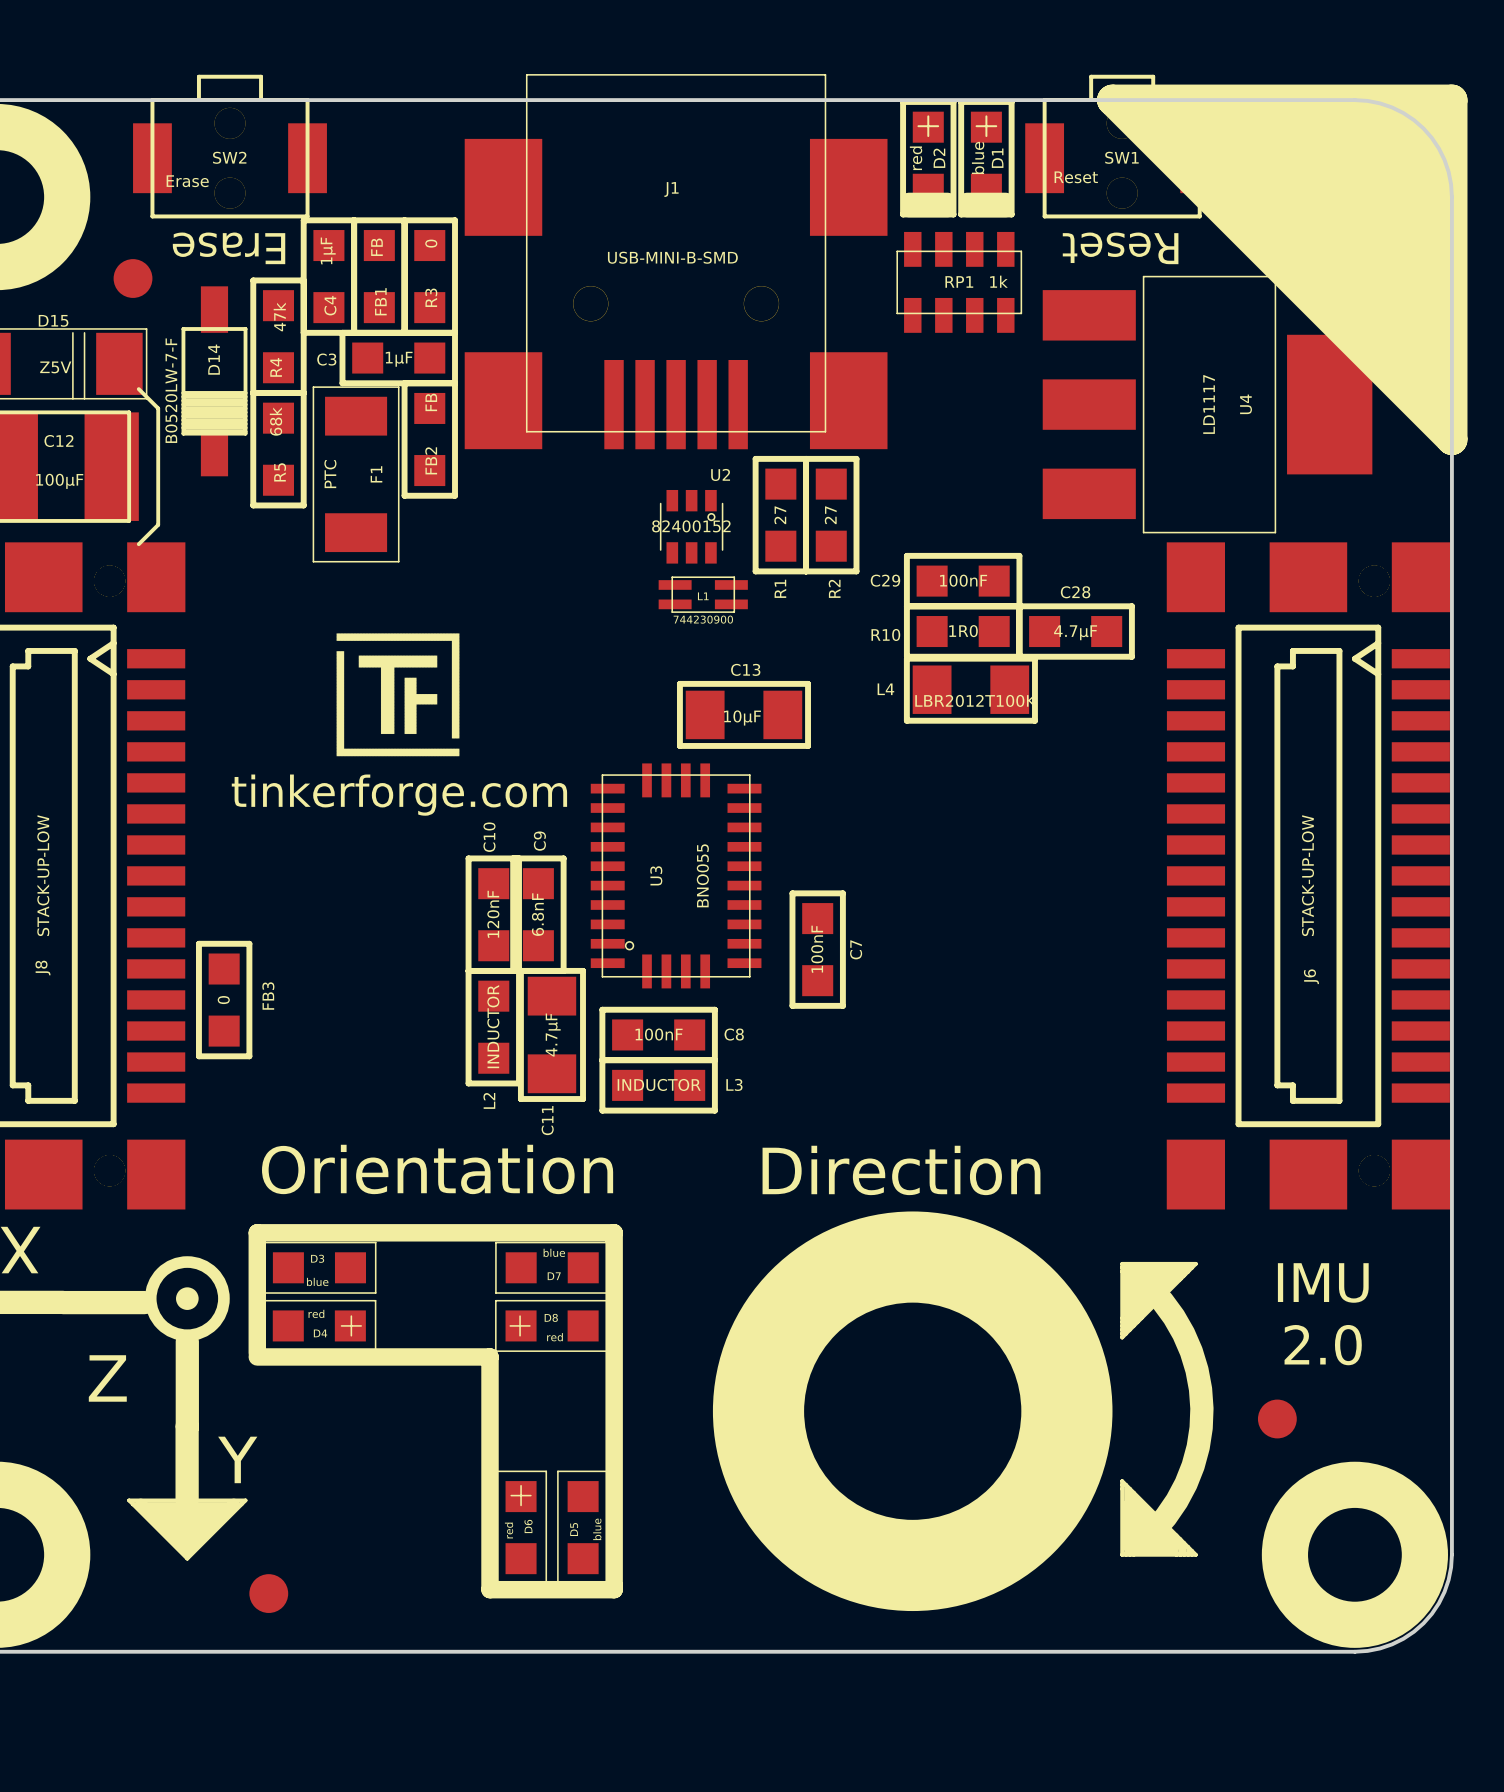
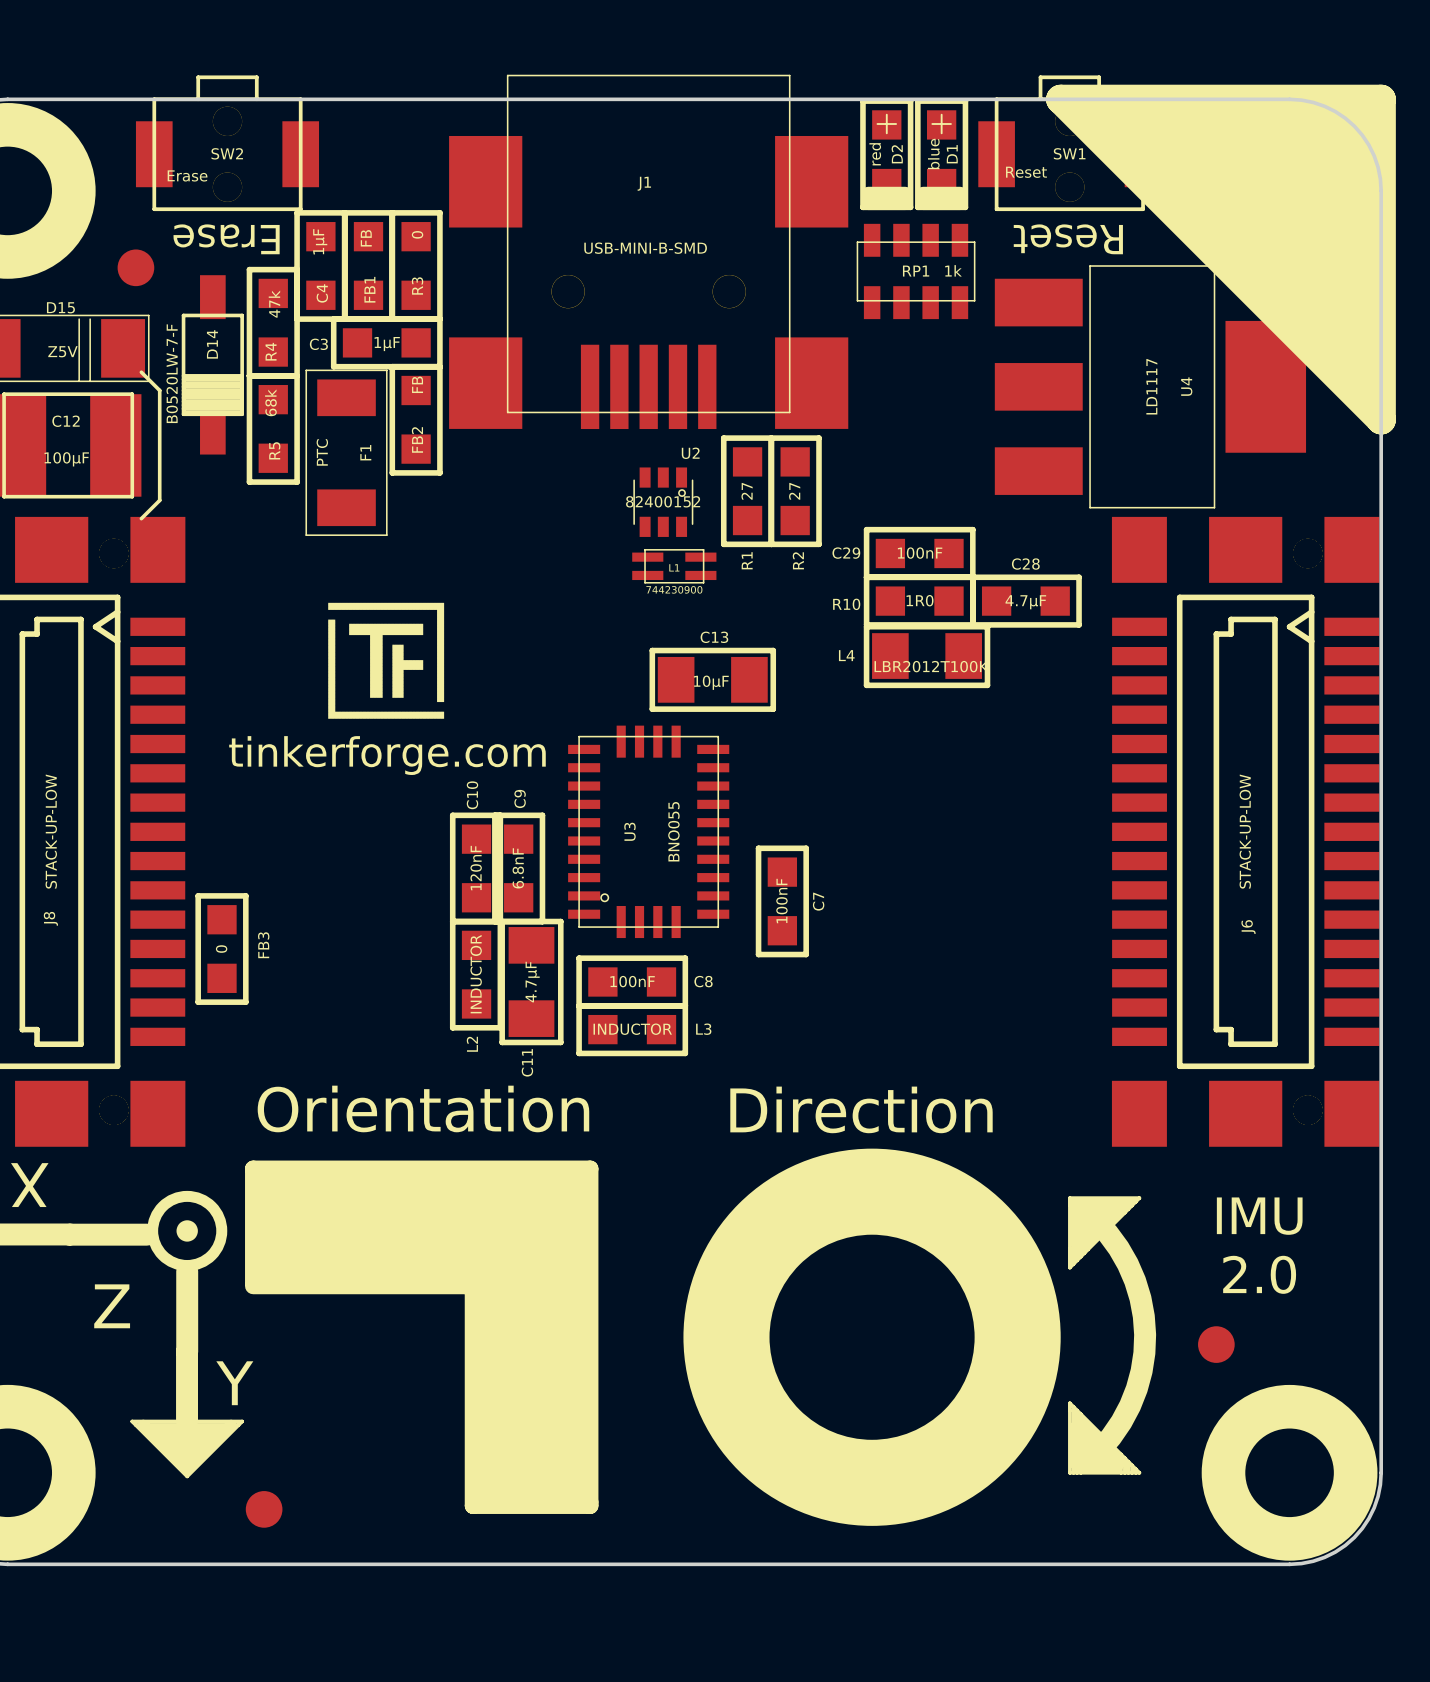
drawing: none -> [256, 1172, 587, 1503]

